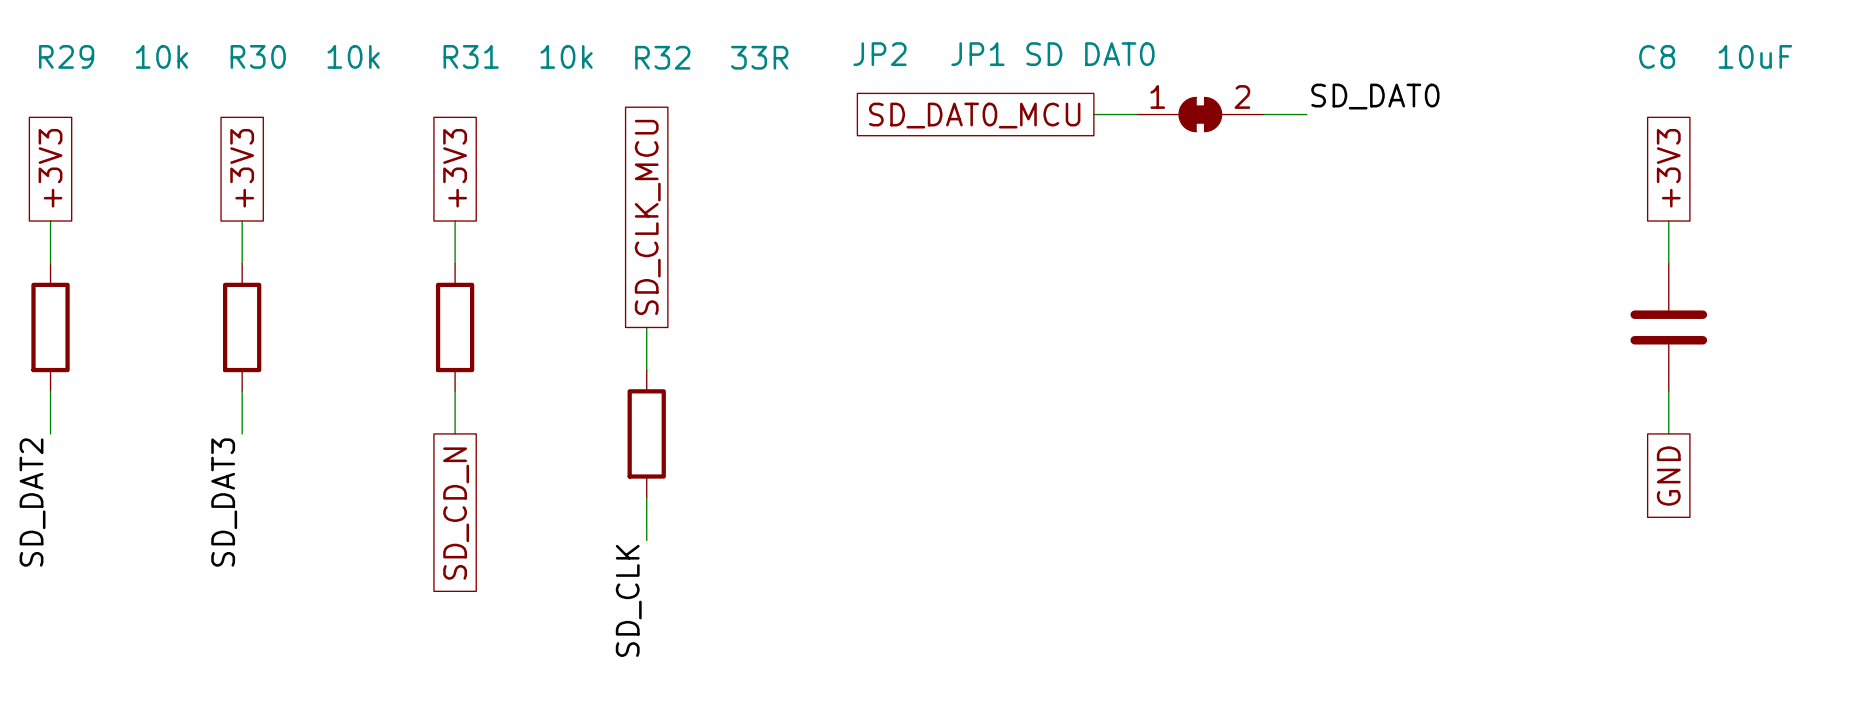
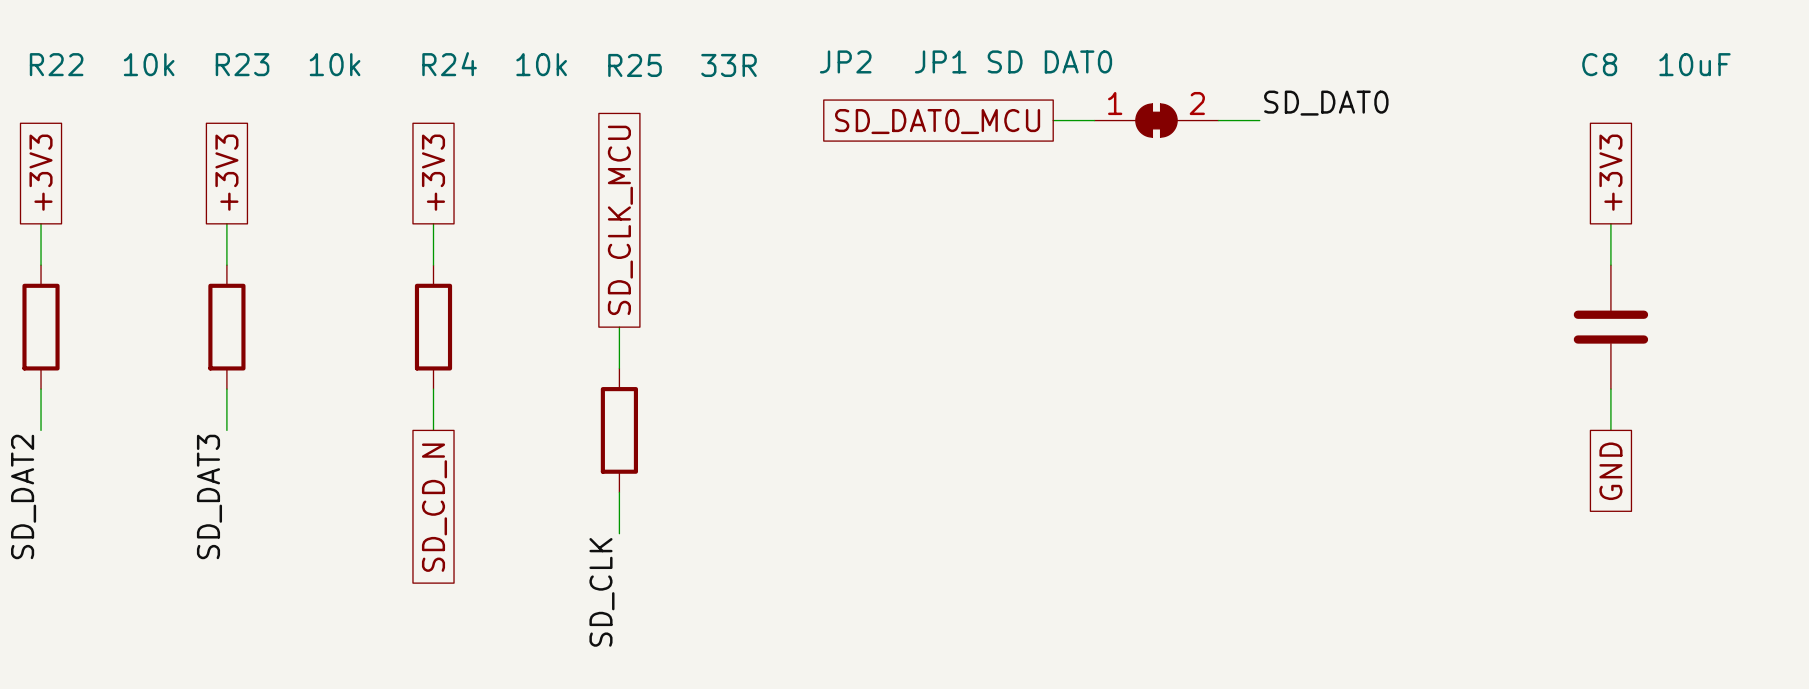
R29 name: R29 (66, 56) -> R22 (56, 64)
R30 name: R30 (258, 56) -> R23 (242, 64)
R31 name: R31 (471, 56) -> R24 (449, 64)
R32 name: R32 (662, 57) -> R25 (635, 65)

